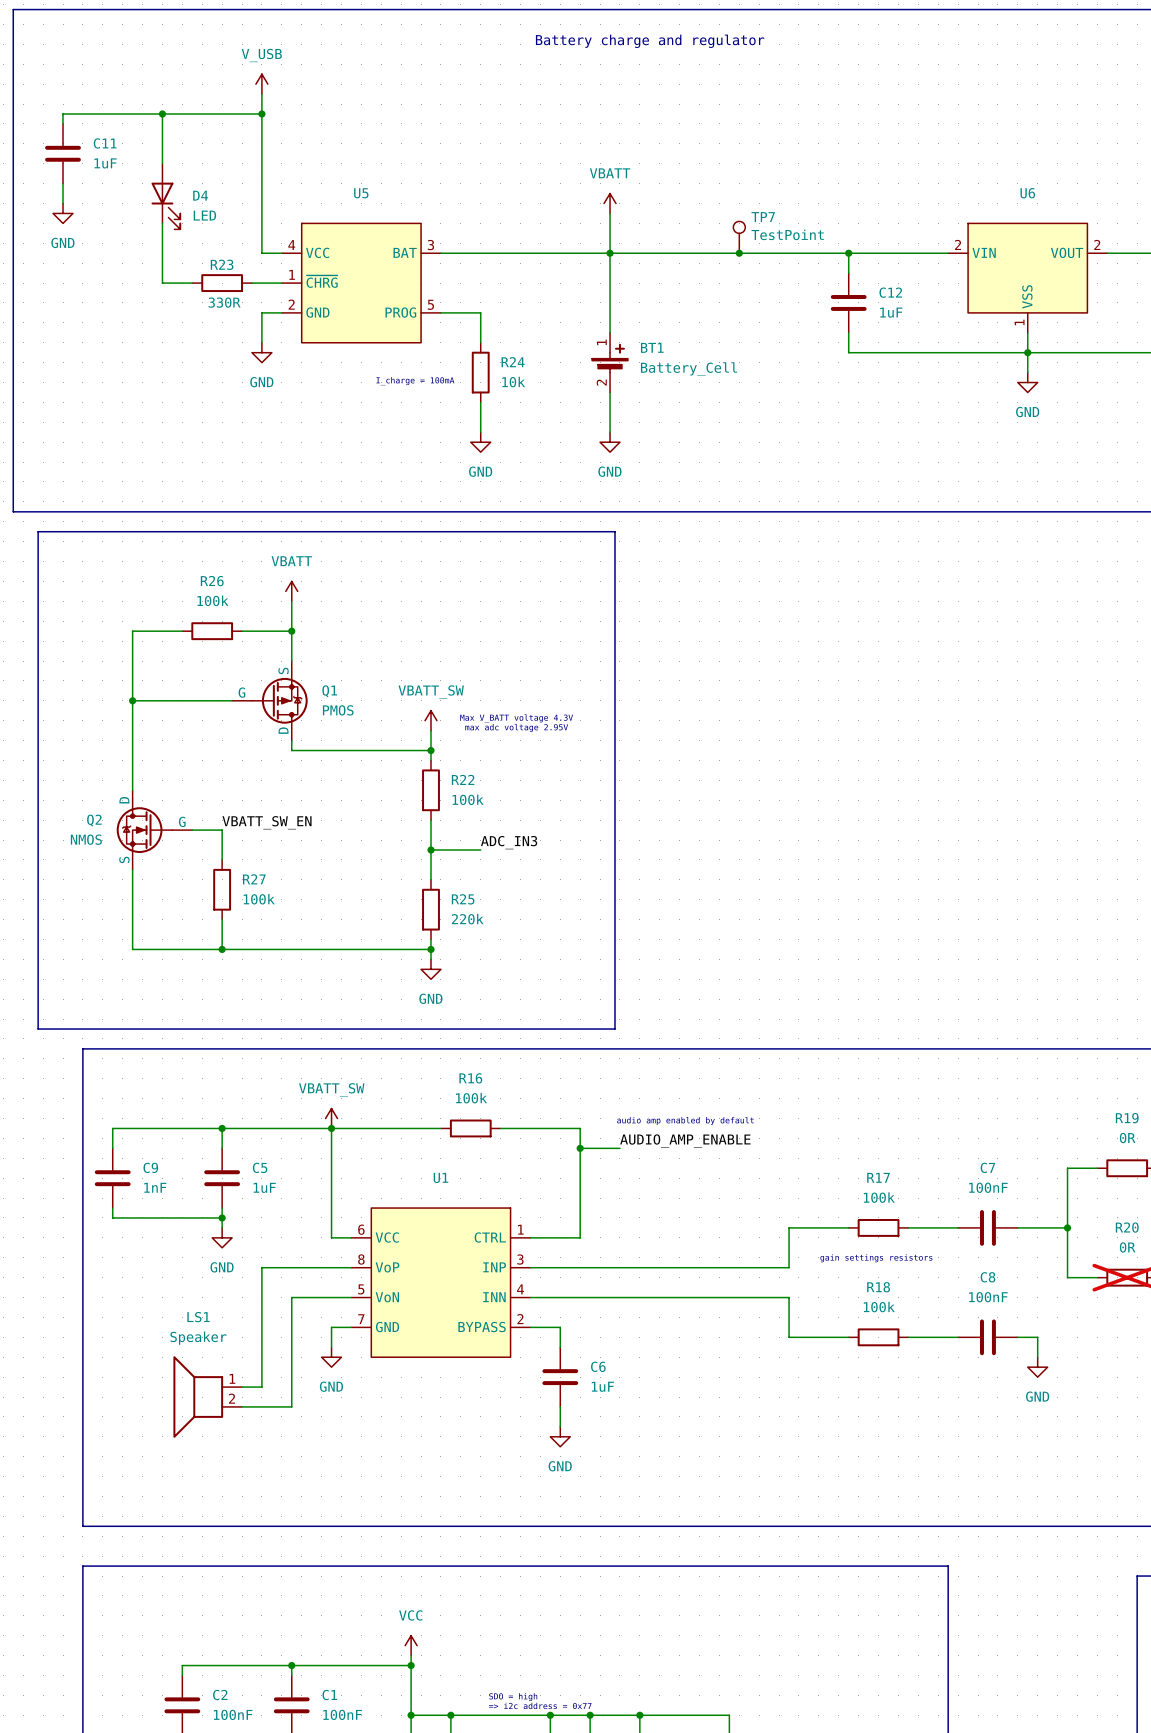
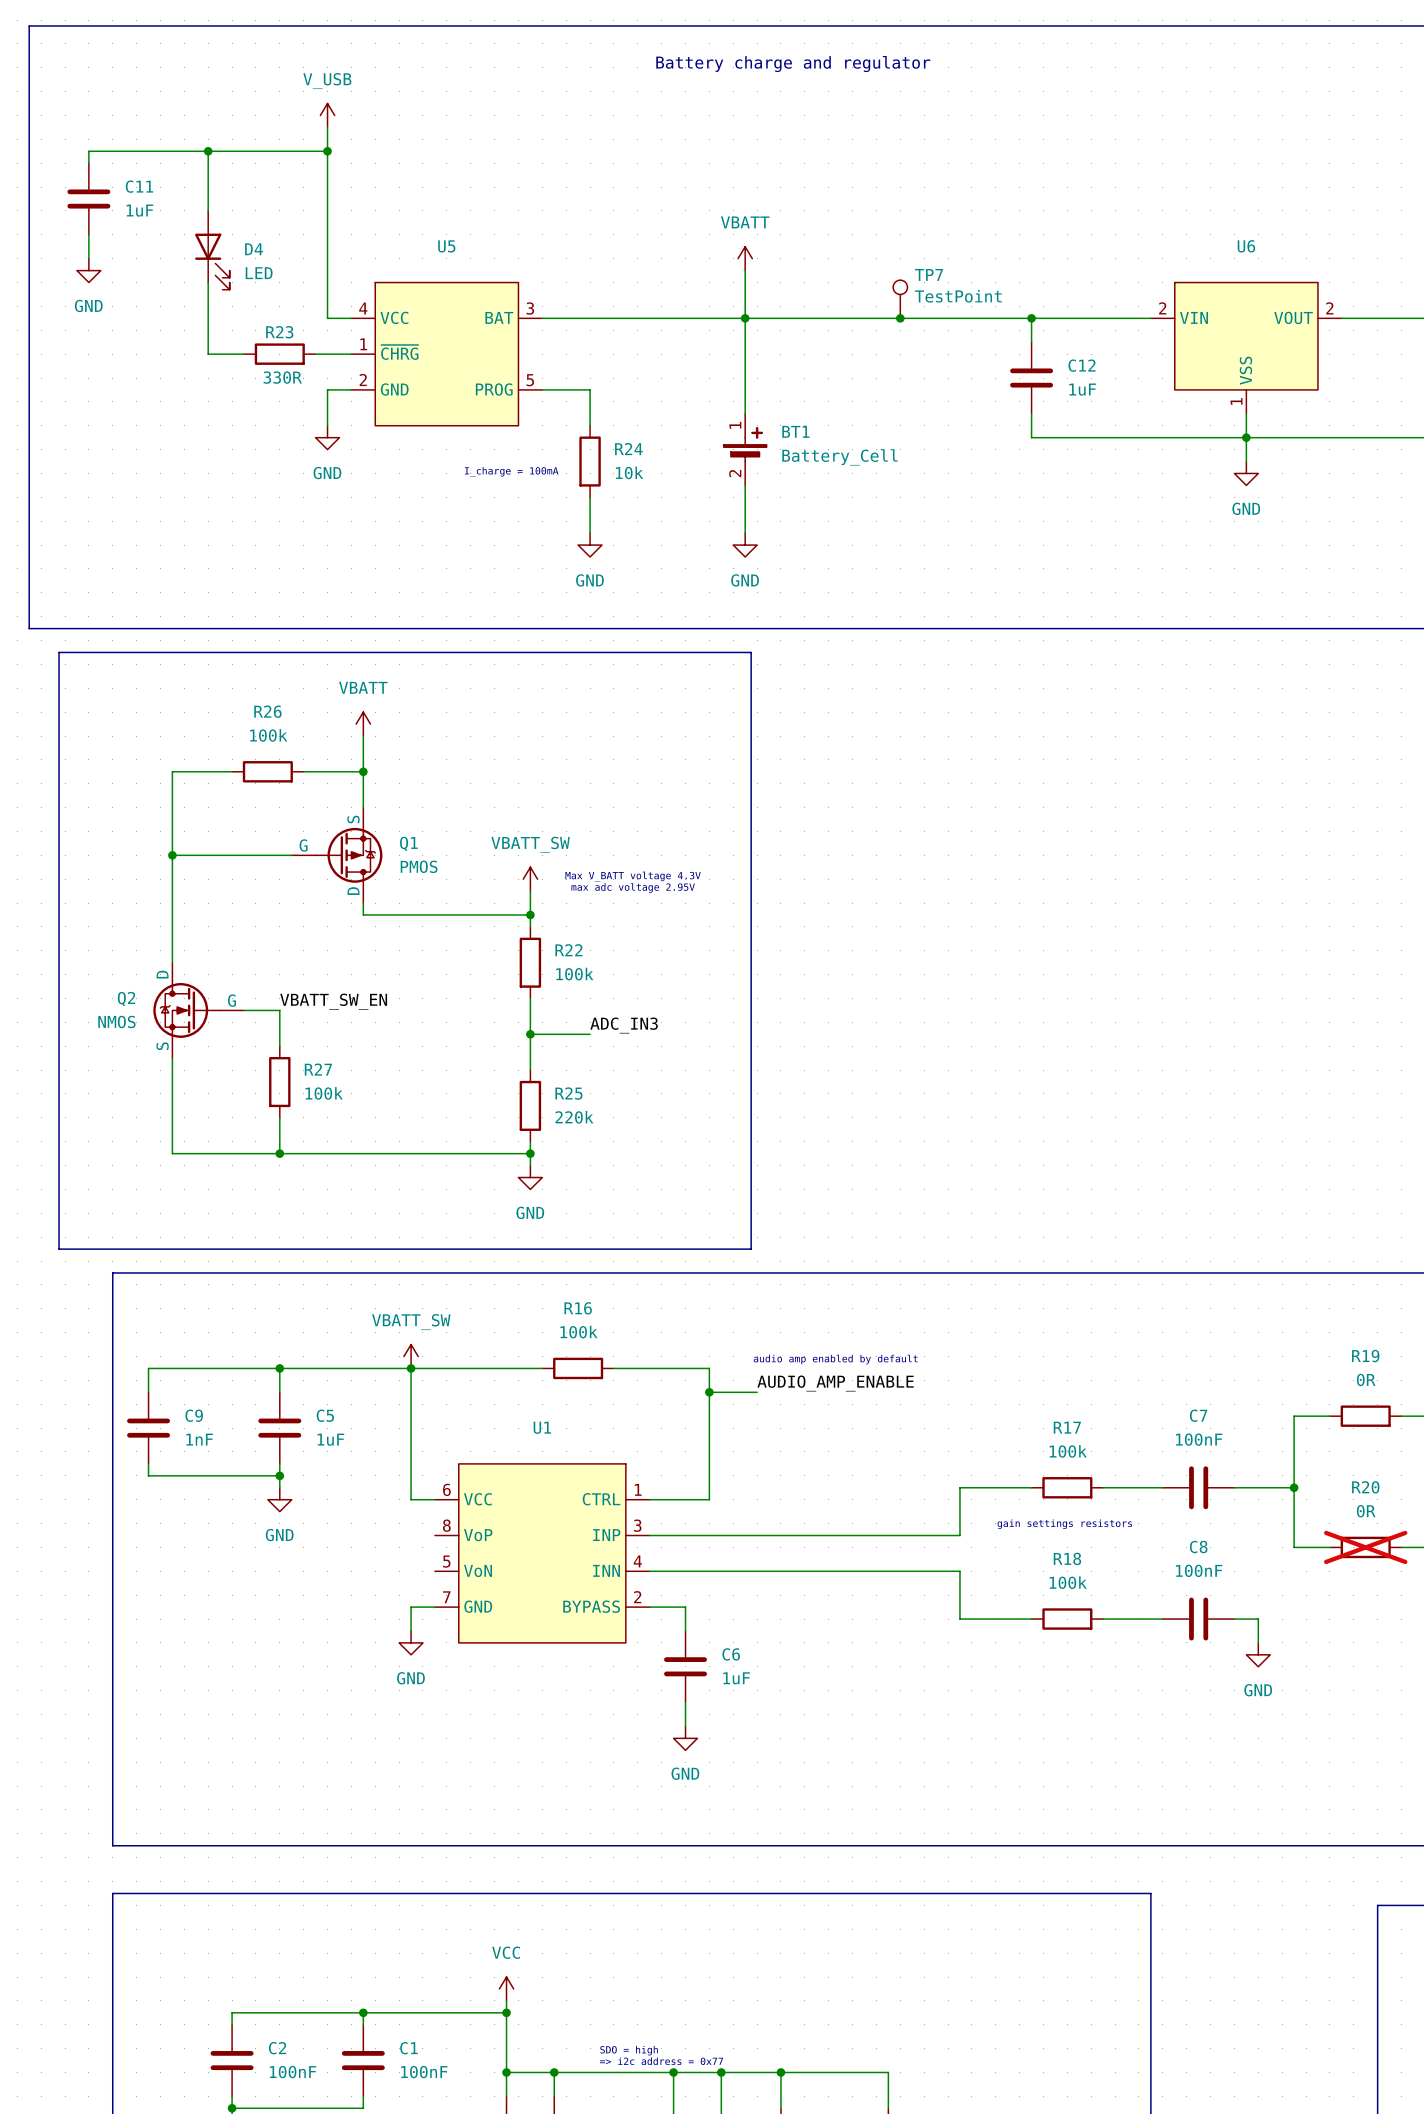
wire: (351, 1267) (261, 1267) (261, 1387) (242, 1387) -> none
wire: (351, 1297) (291, 1297) (291, 1406) (242, 1406) -> none
LS1: Speaker (207, 1397) -> none

